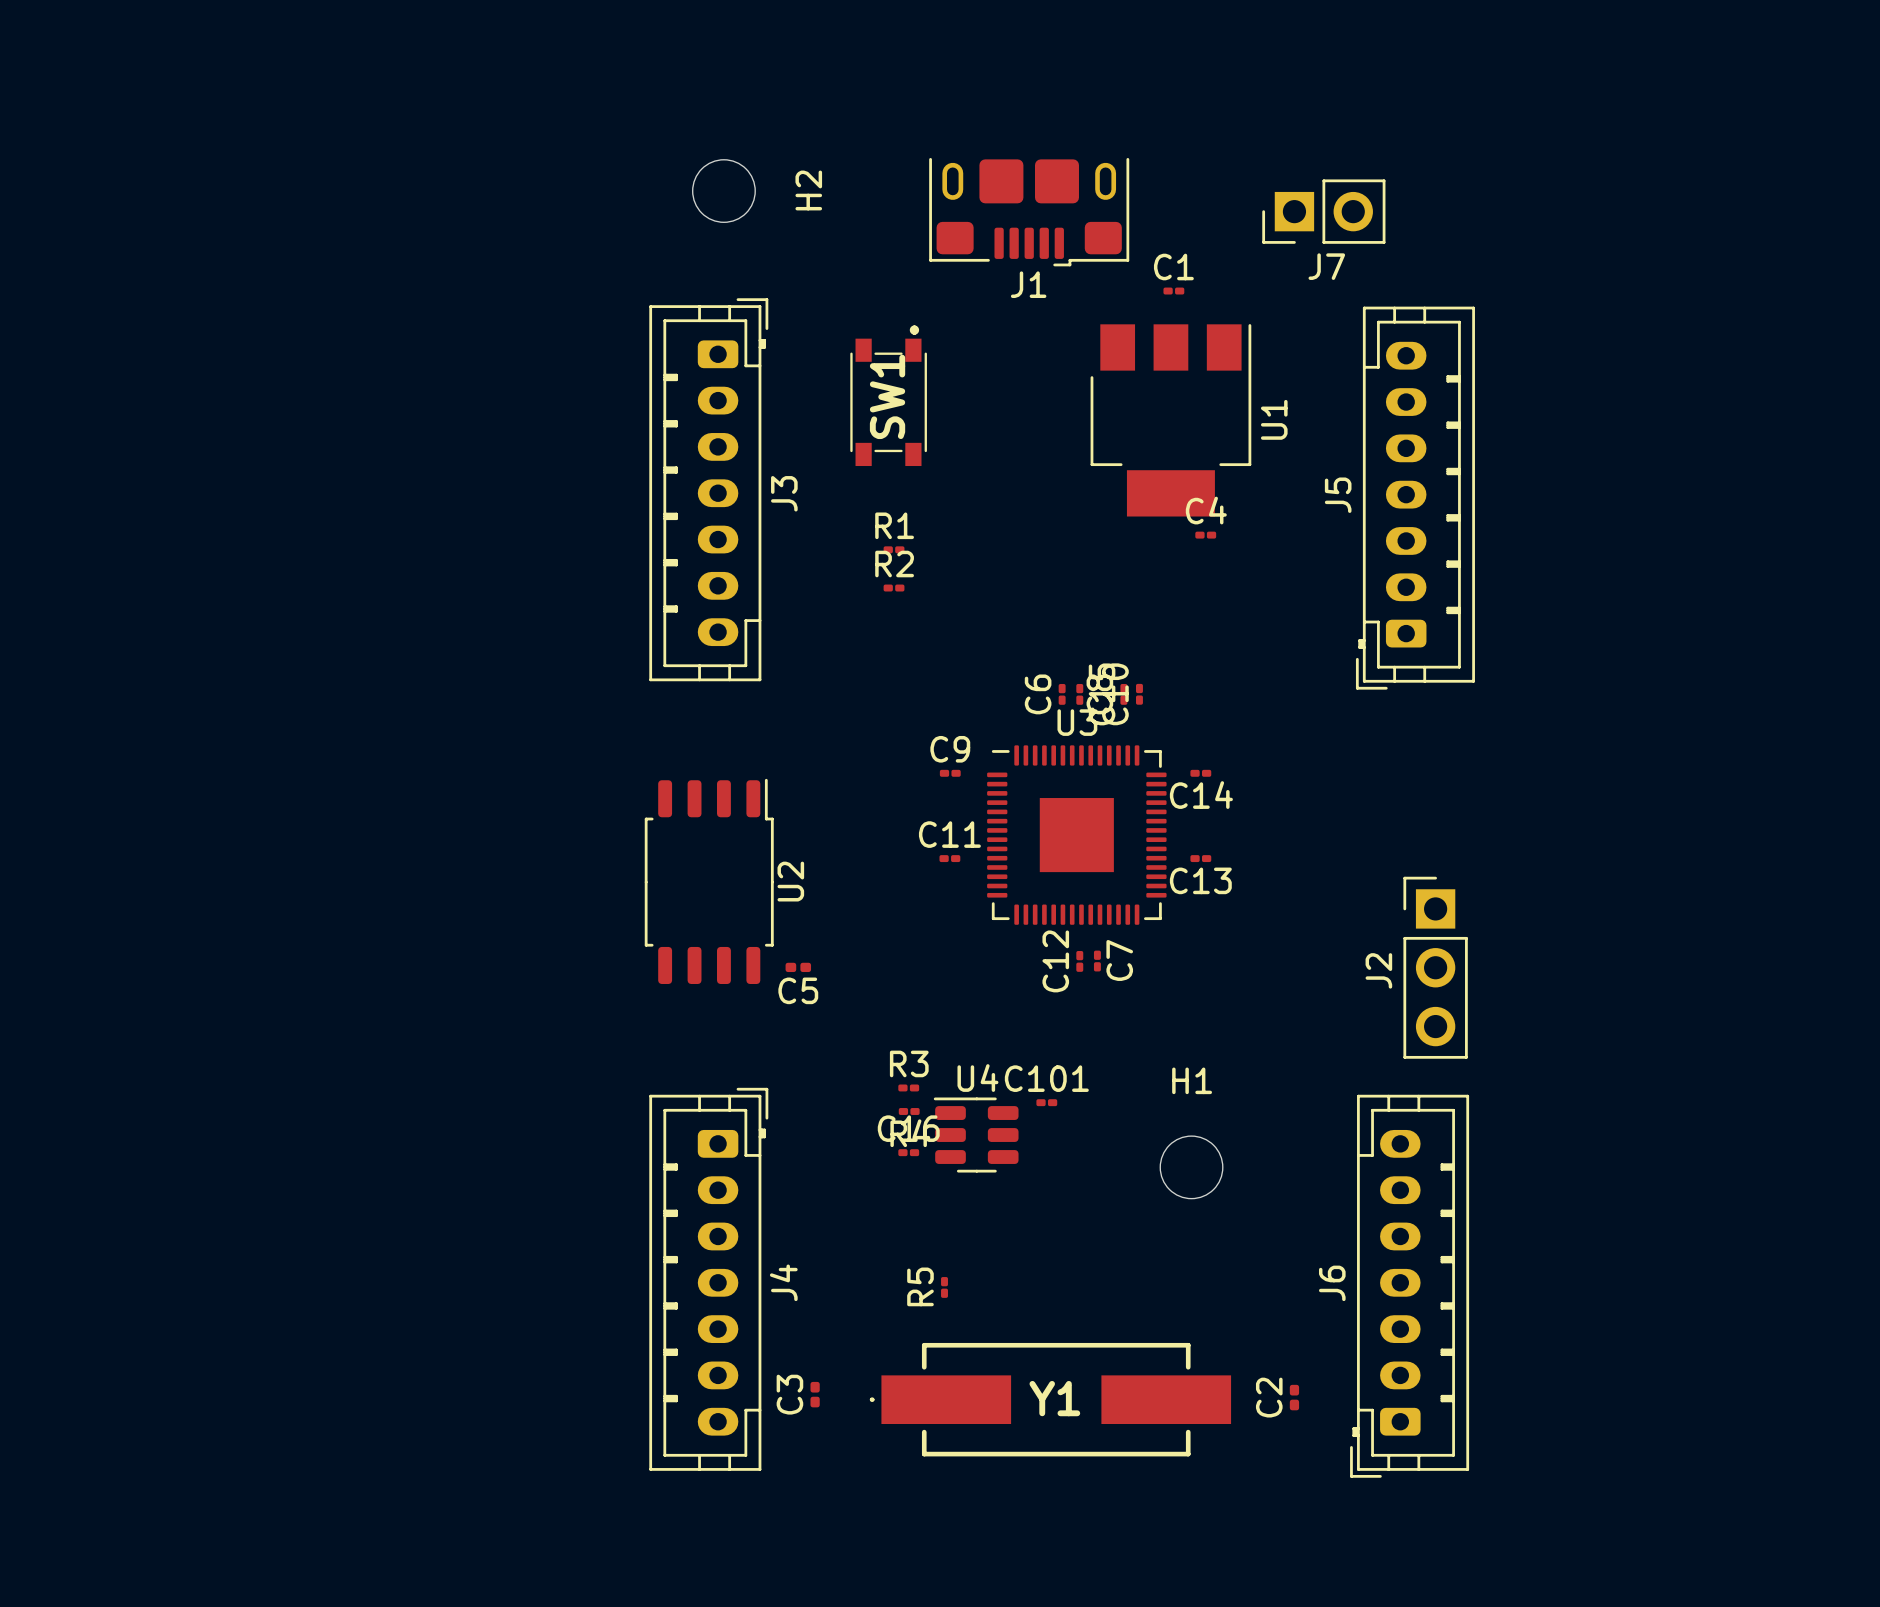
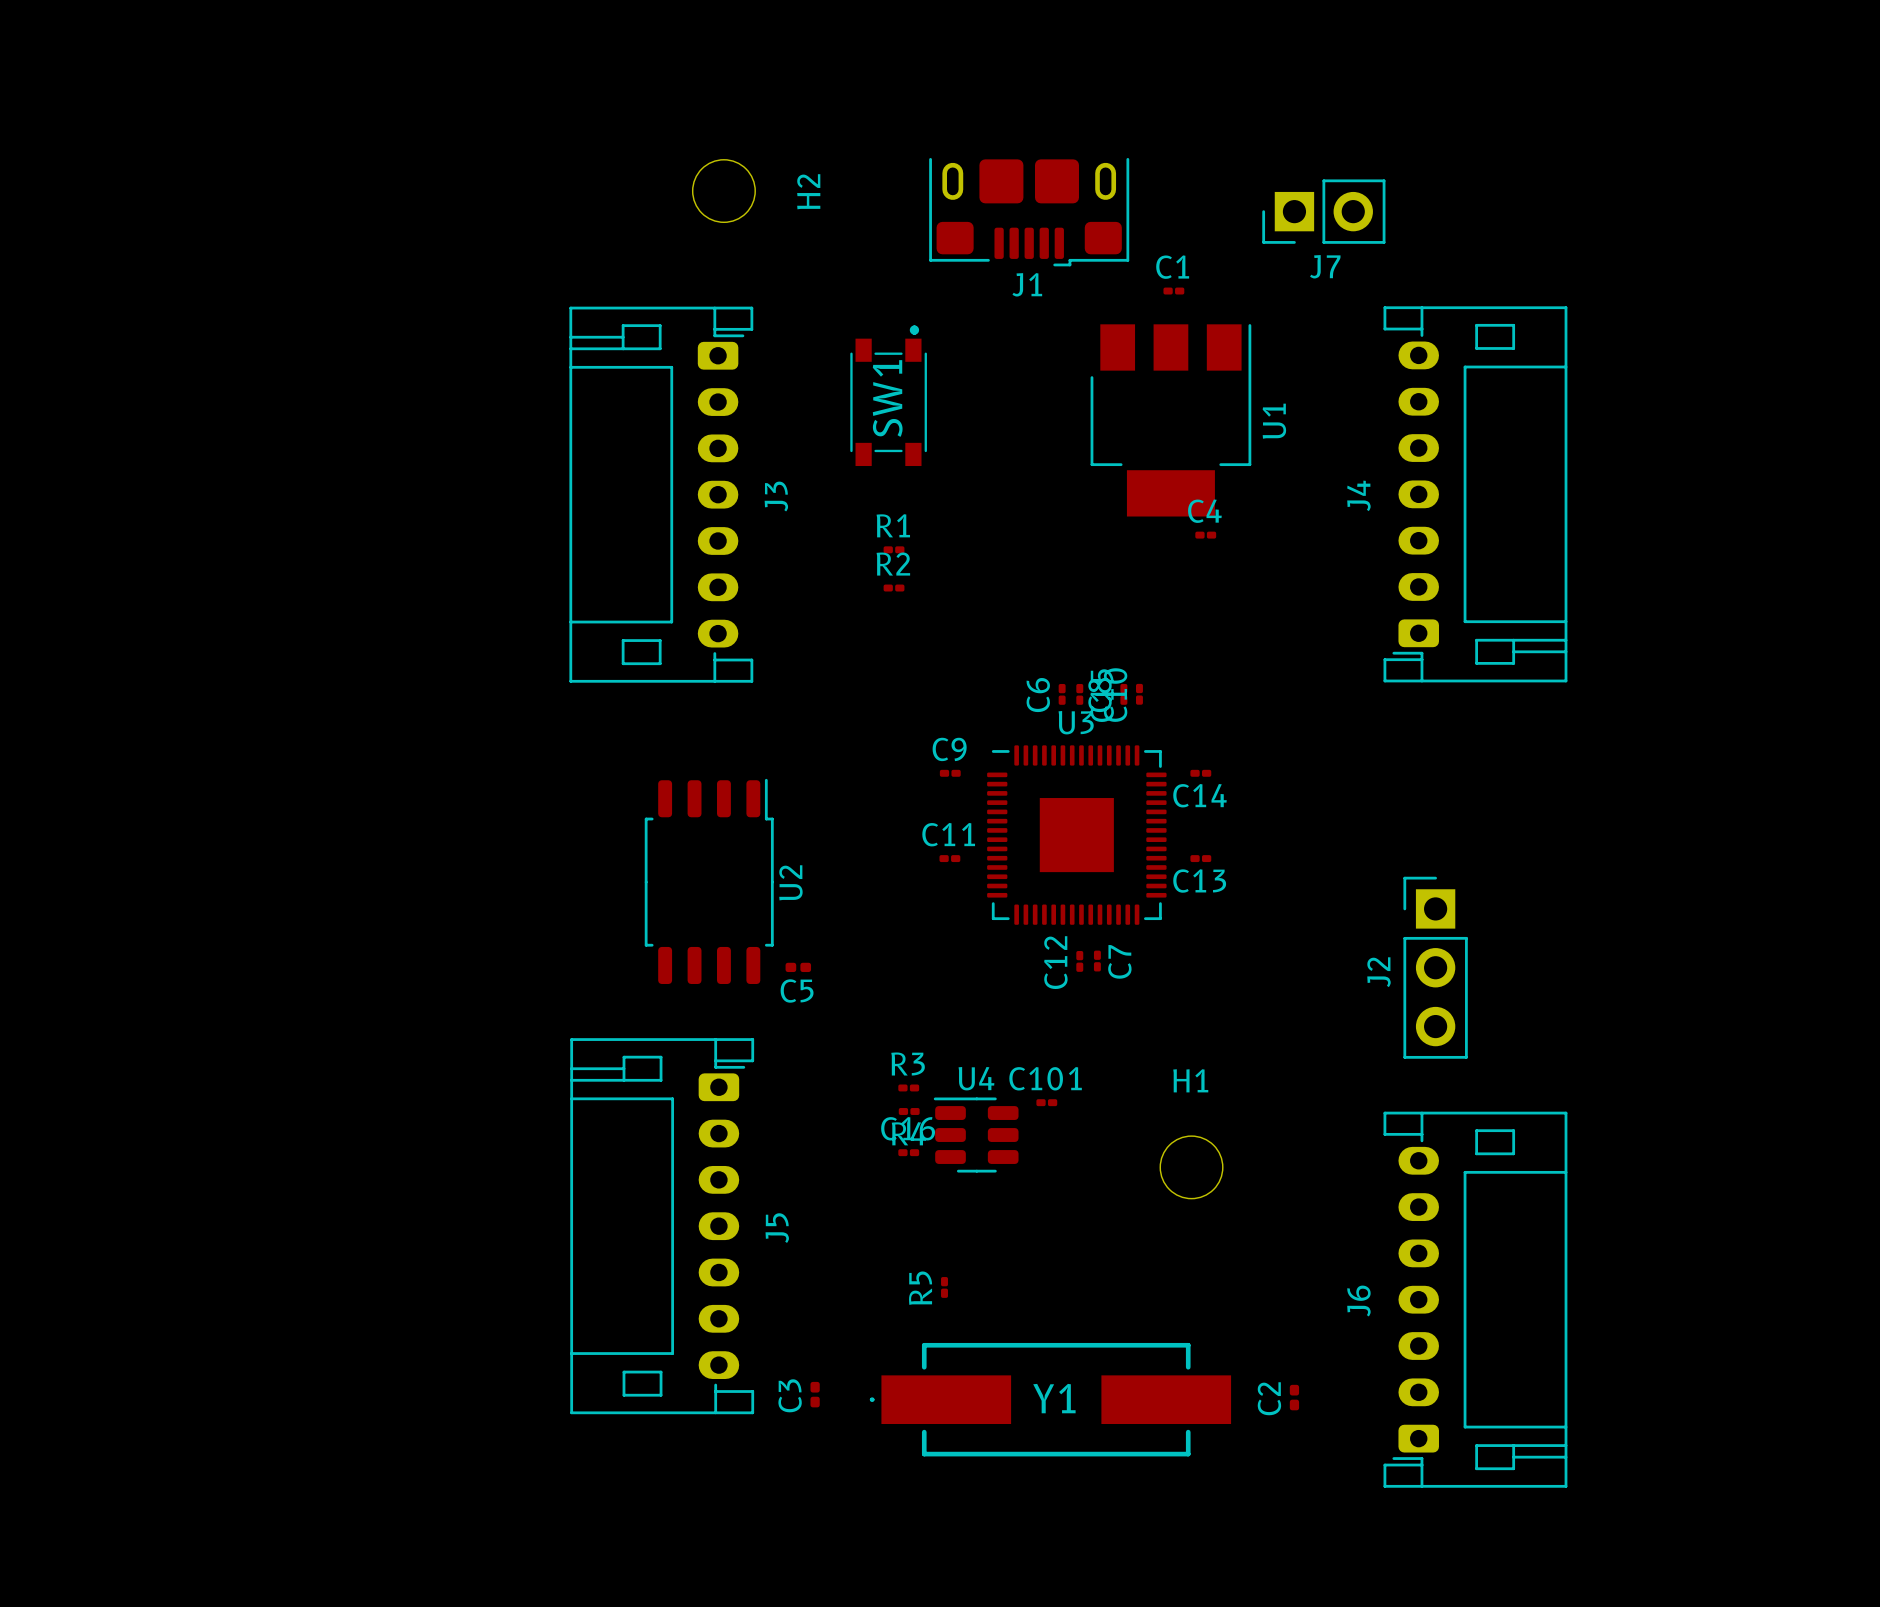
J3 footprint: [649, 298, 769, 682] -> [569, 306, 754, 683]
J5 footprint: [1355, 306, 1475, 690] -> [570, 1038, 755, 1415]
J5 name position: J5 (1338, 495) -> J5 (777, 1228)
J4 footprint: [649, 1087, 769, 1471] -> [1383, 306, 1568, 683]
J6 footprint: [1350, 1094, 1470, 1478] -> [1383, 1111, 1568, 1488]
J4 name position: J4 (783, 1282) -> J4 (1358, 495)

